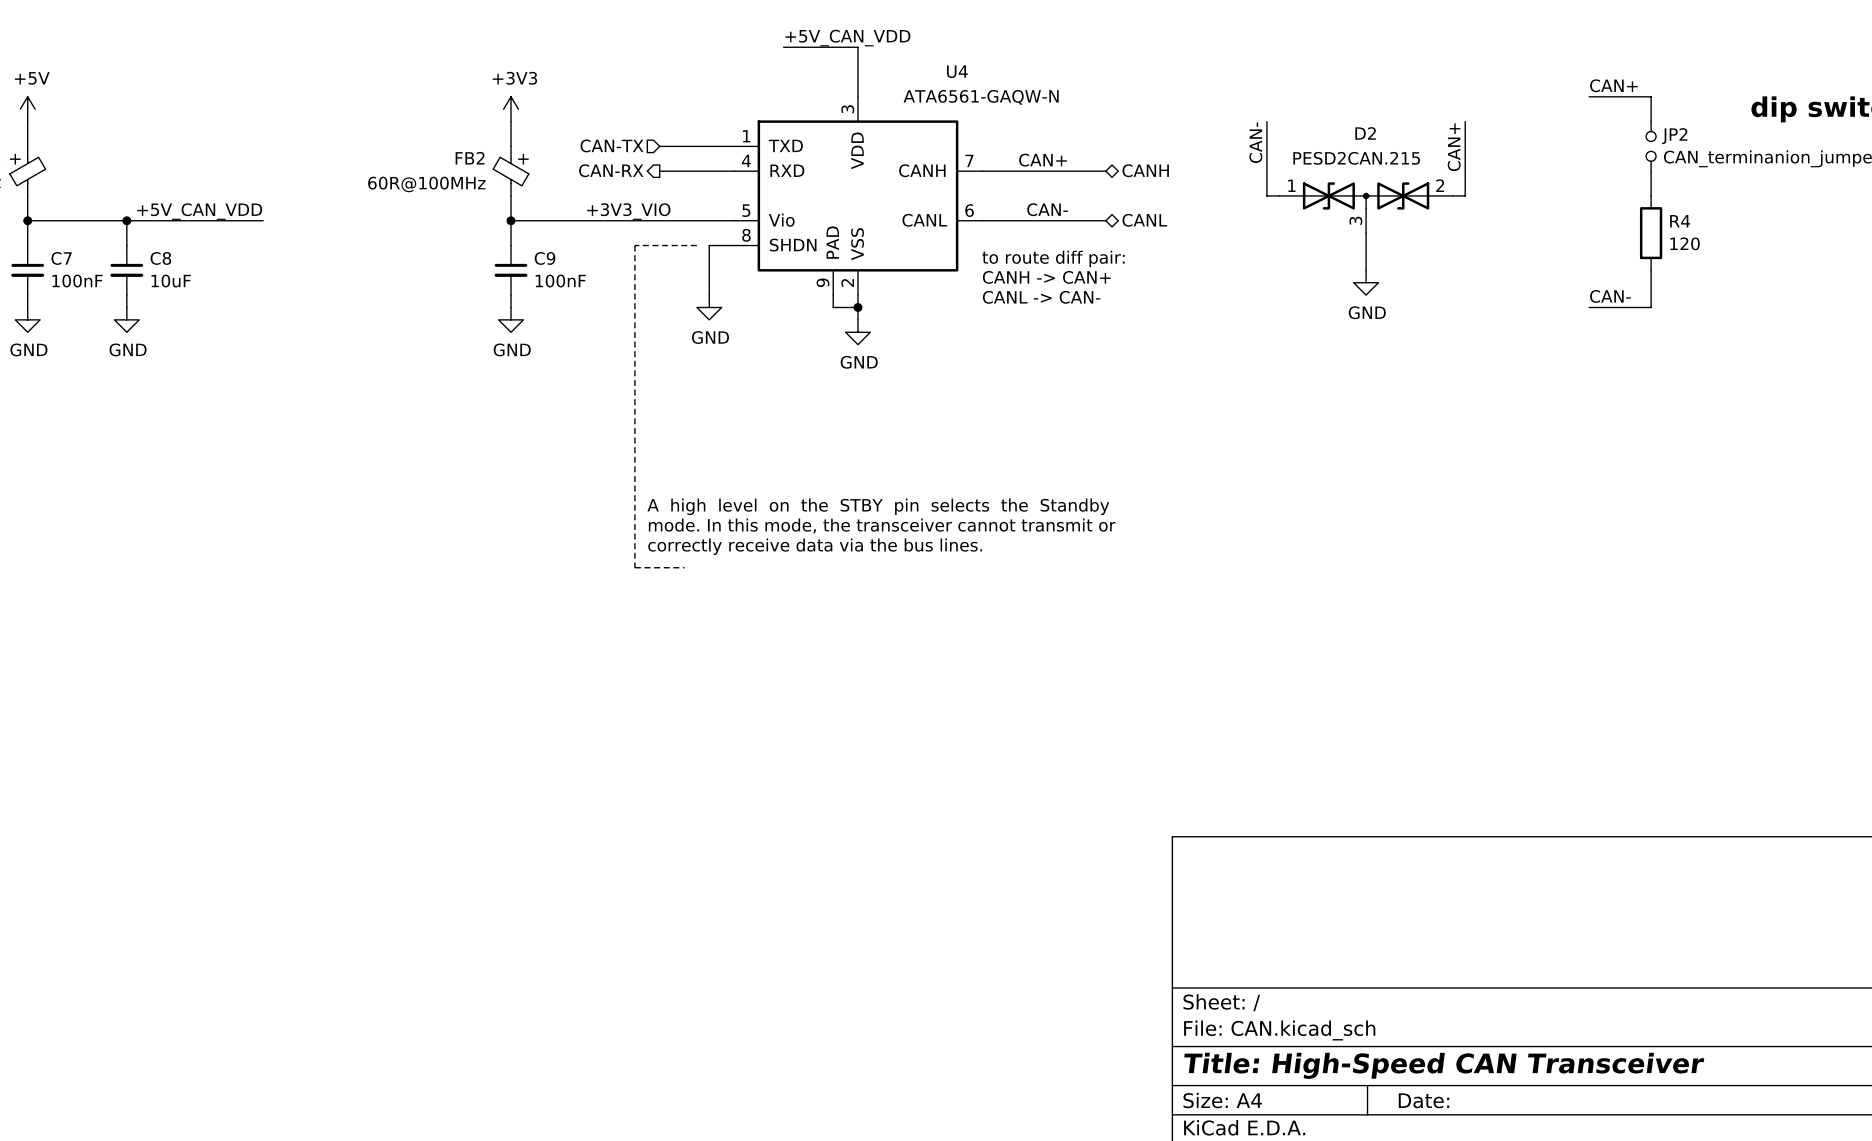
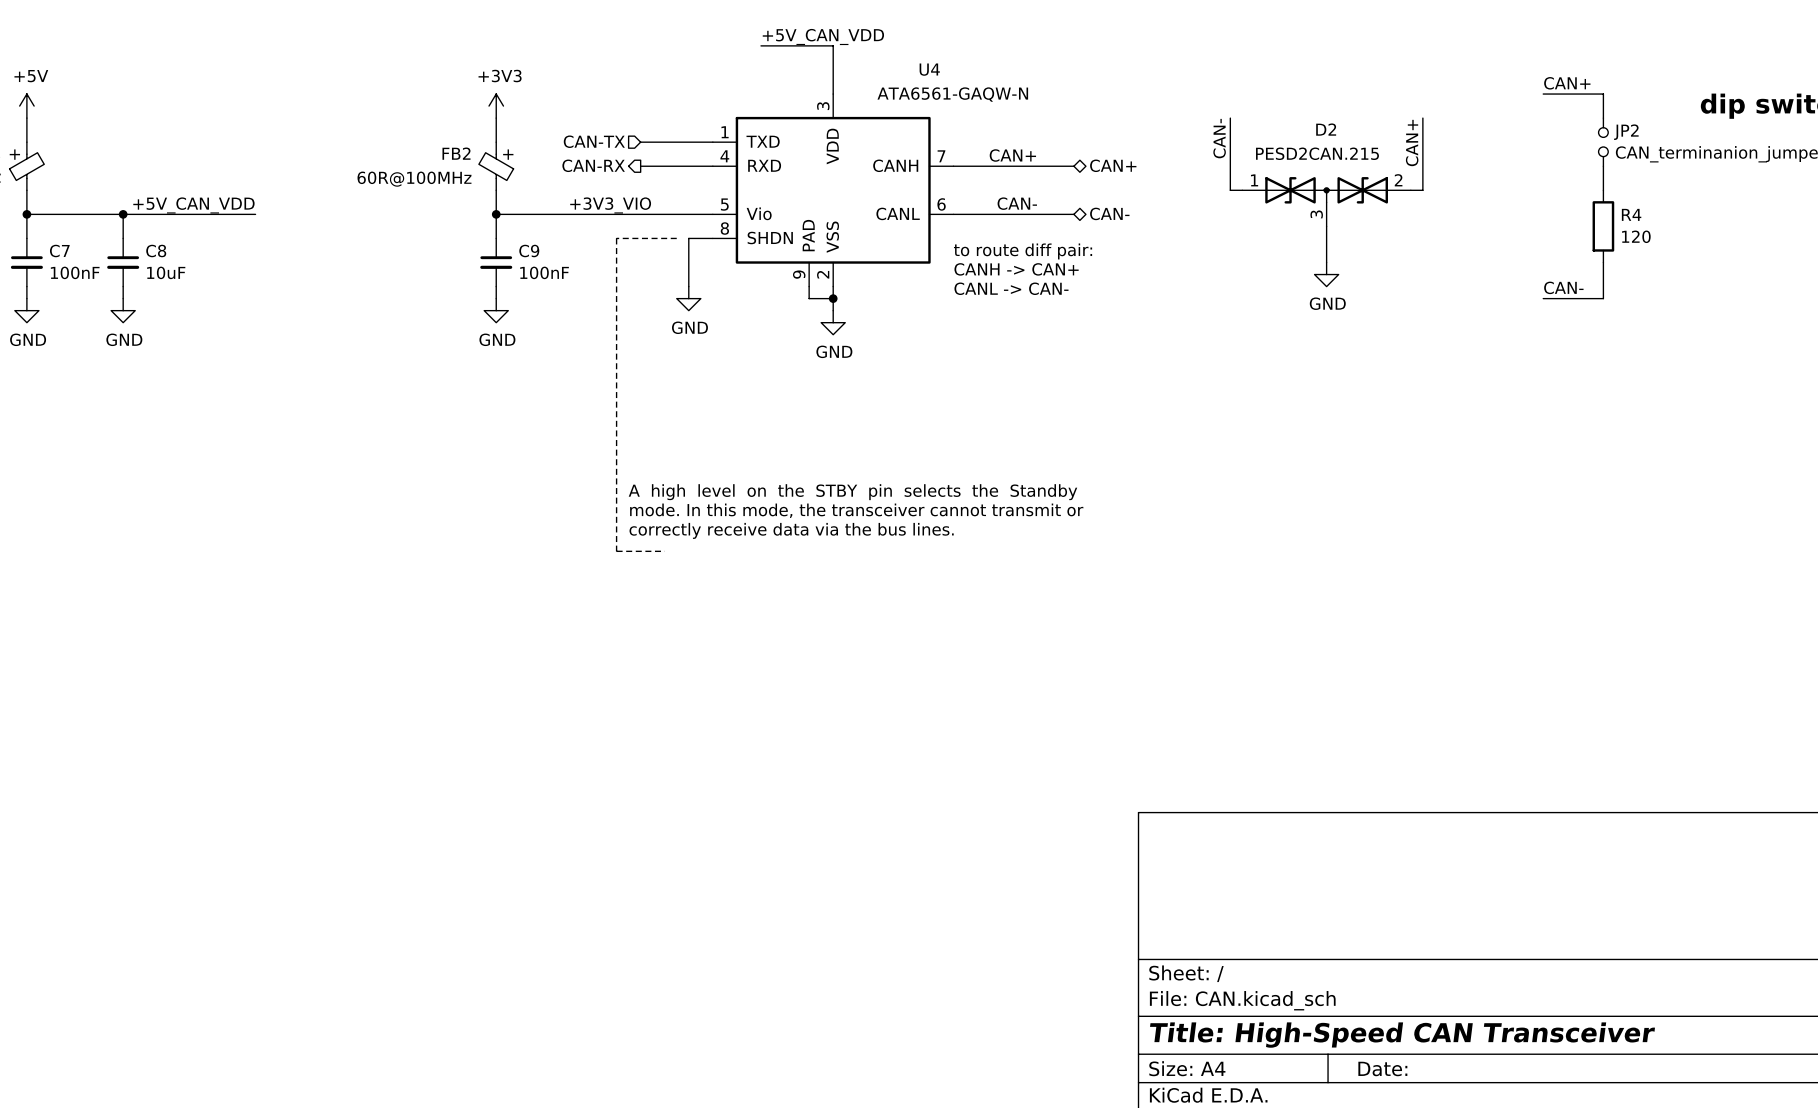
hierarchical label: CANH (1145, 170) -> CAN+ (1113, 165)
hierarchical label: CANL (1144, 220) -> CAN- (1109, 213)

